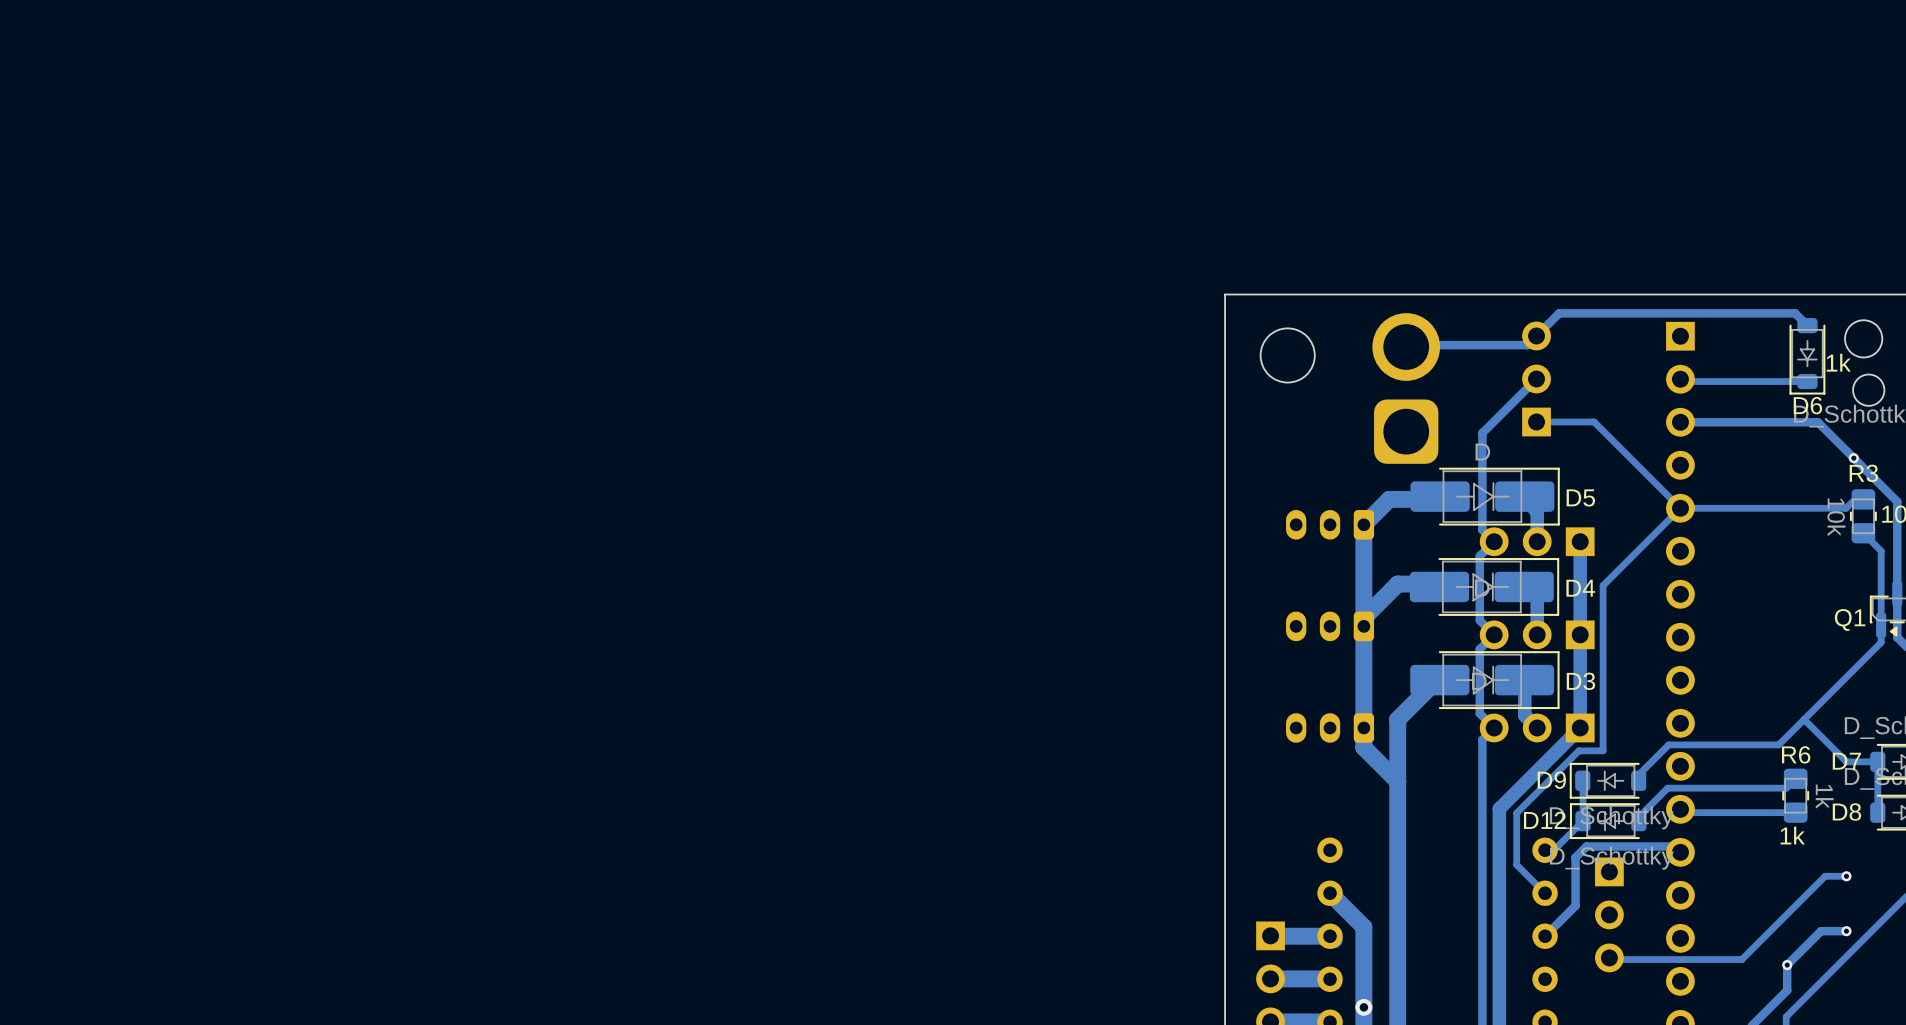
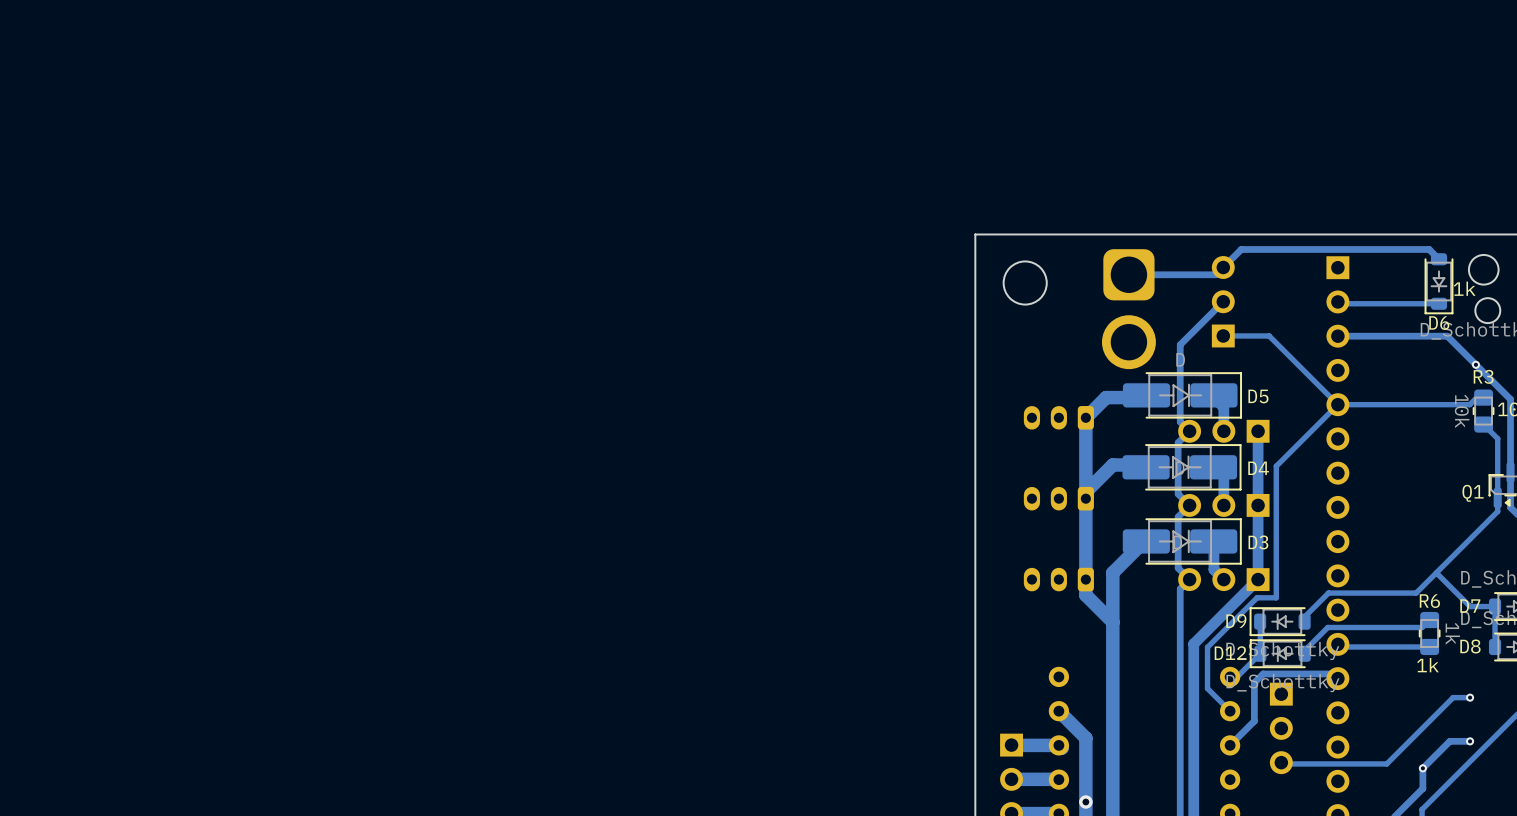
part rotation: 0° (1406, 388) -> 180° (1128, 309)

